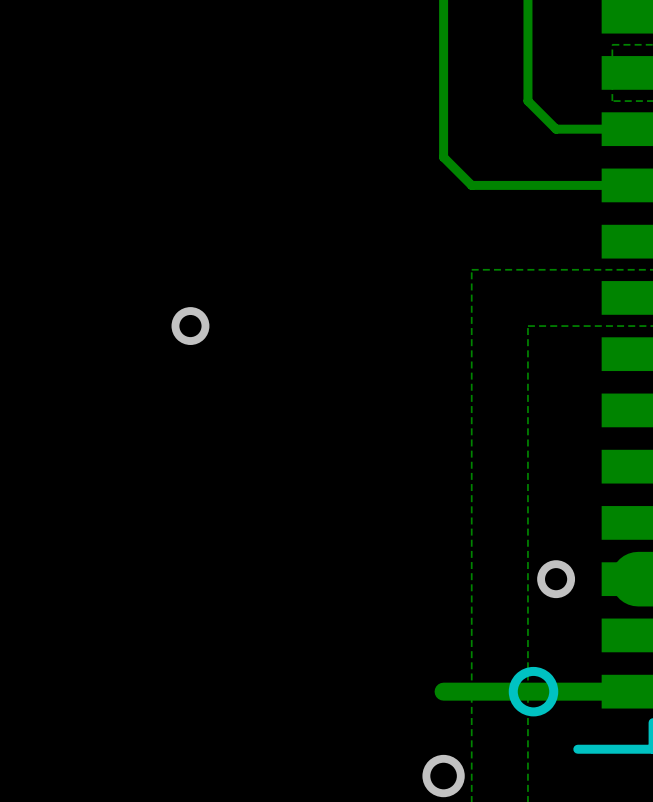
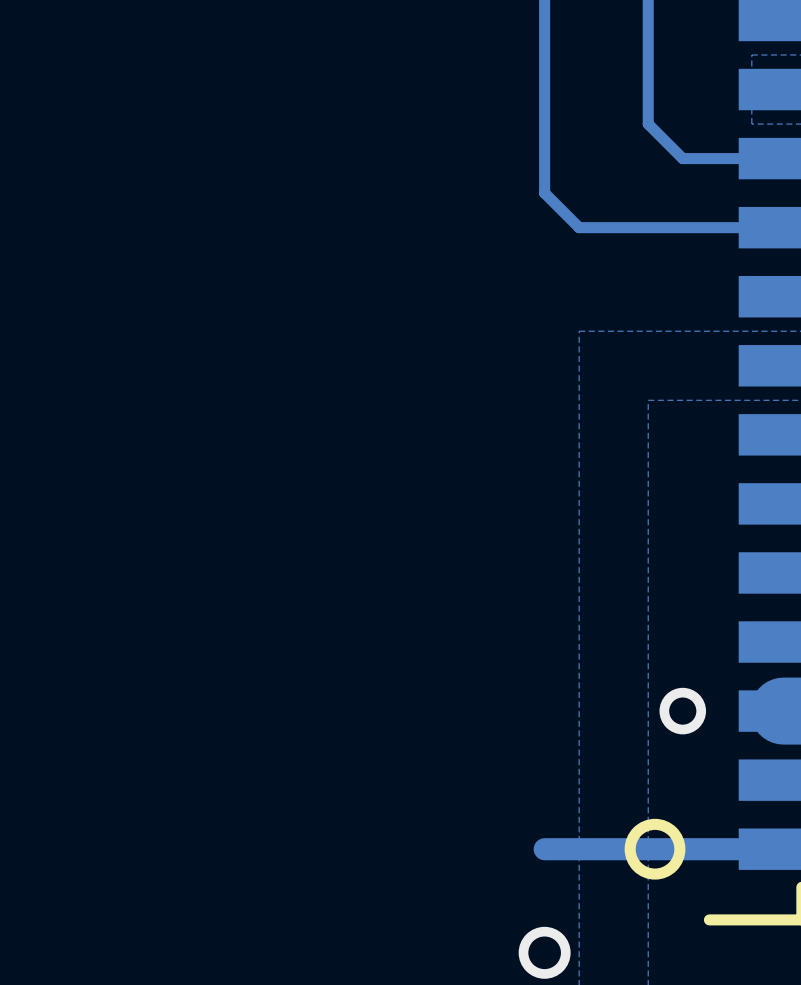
via: (190, 326) -> none

